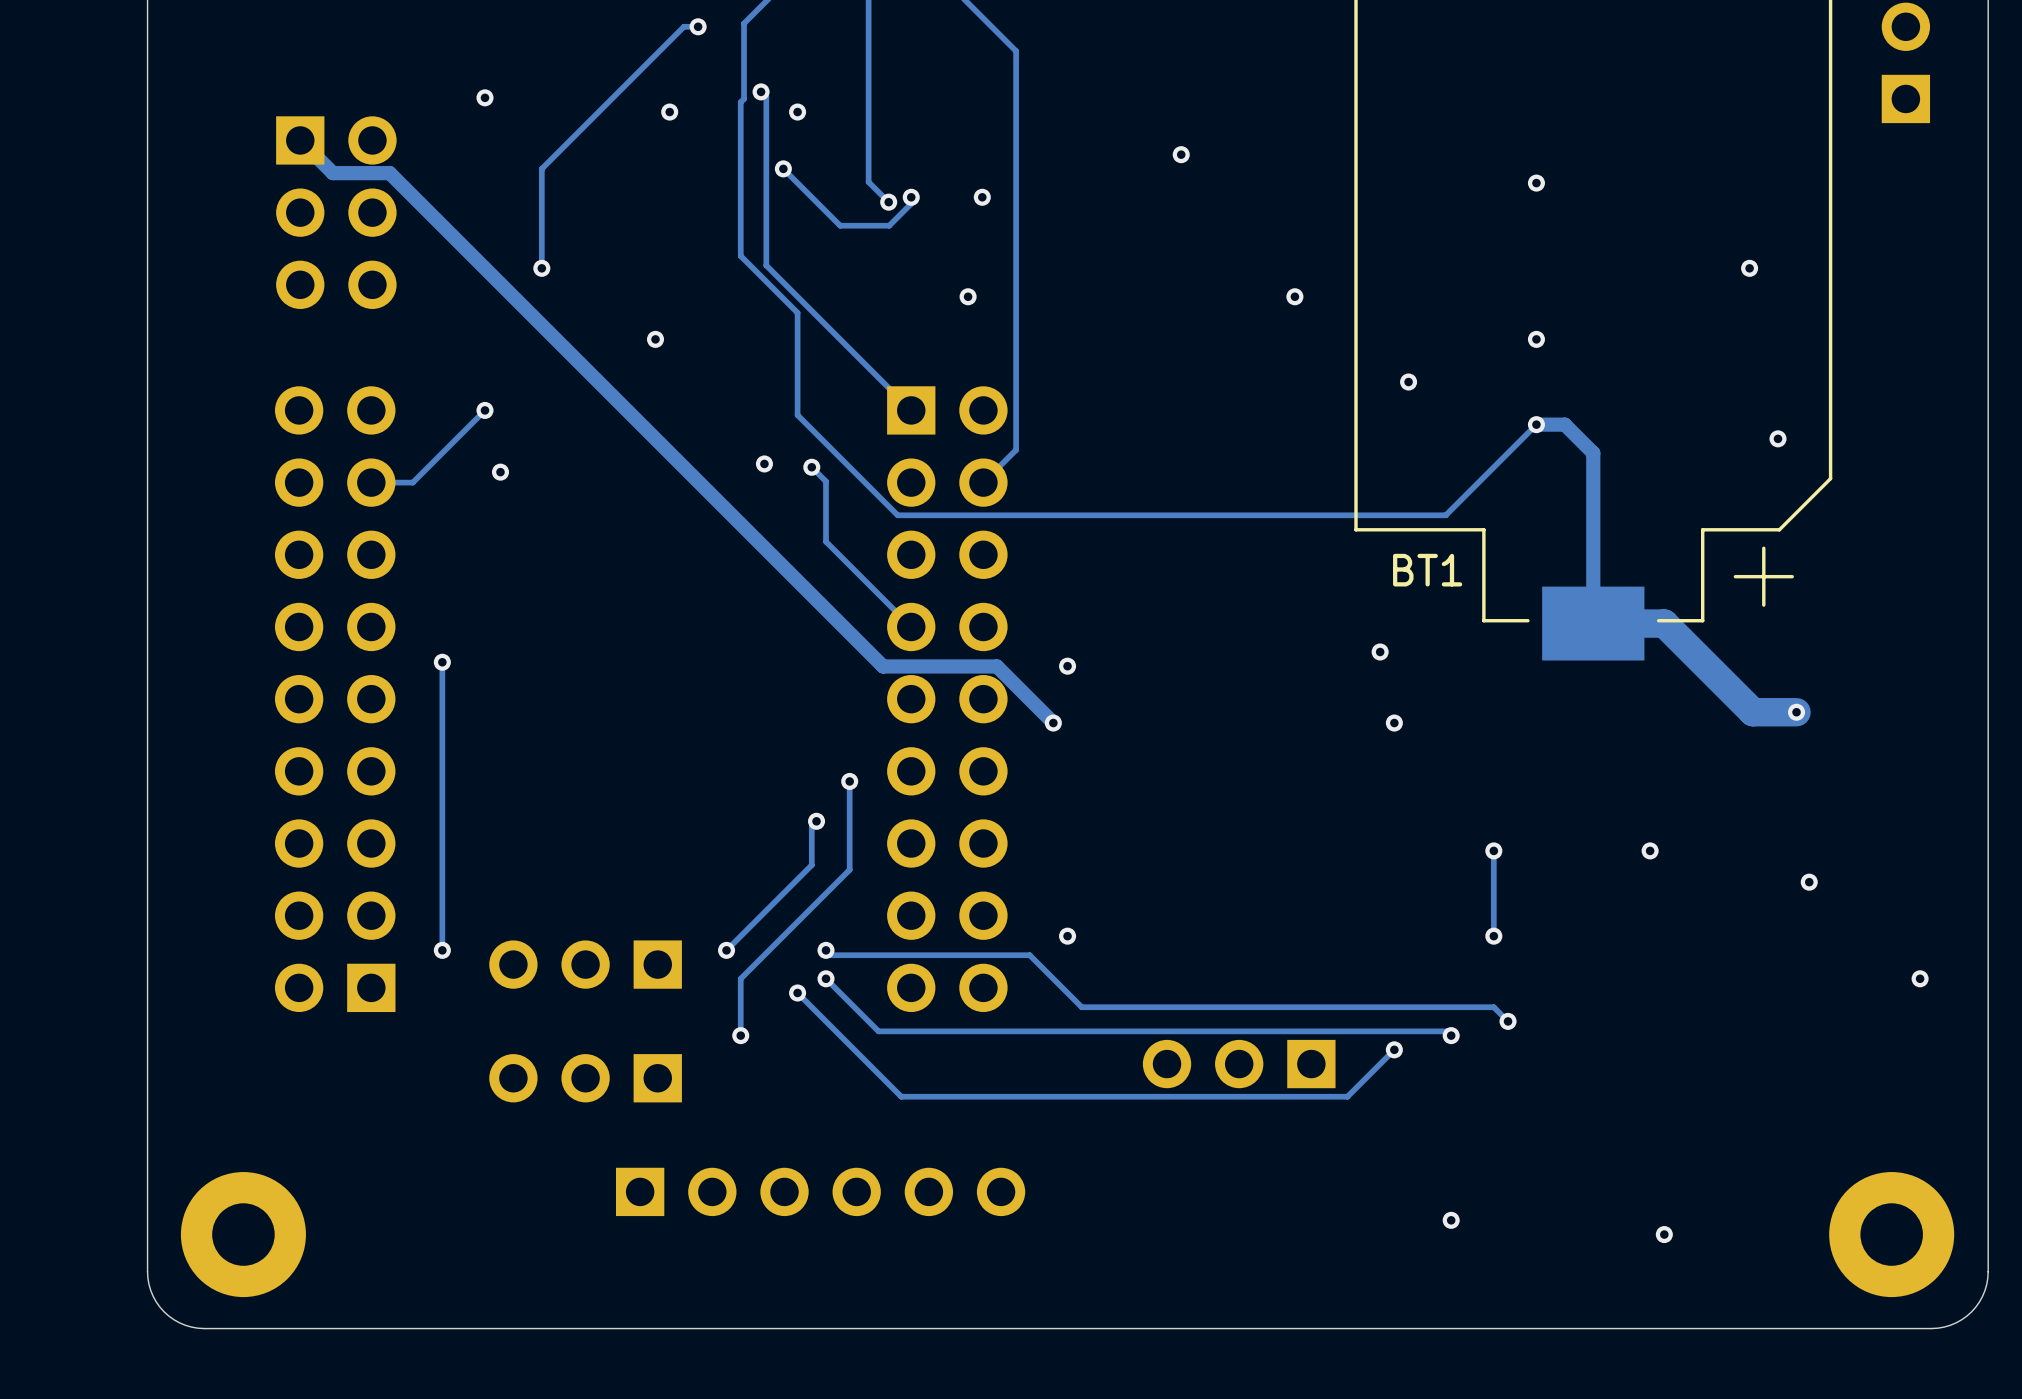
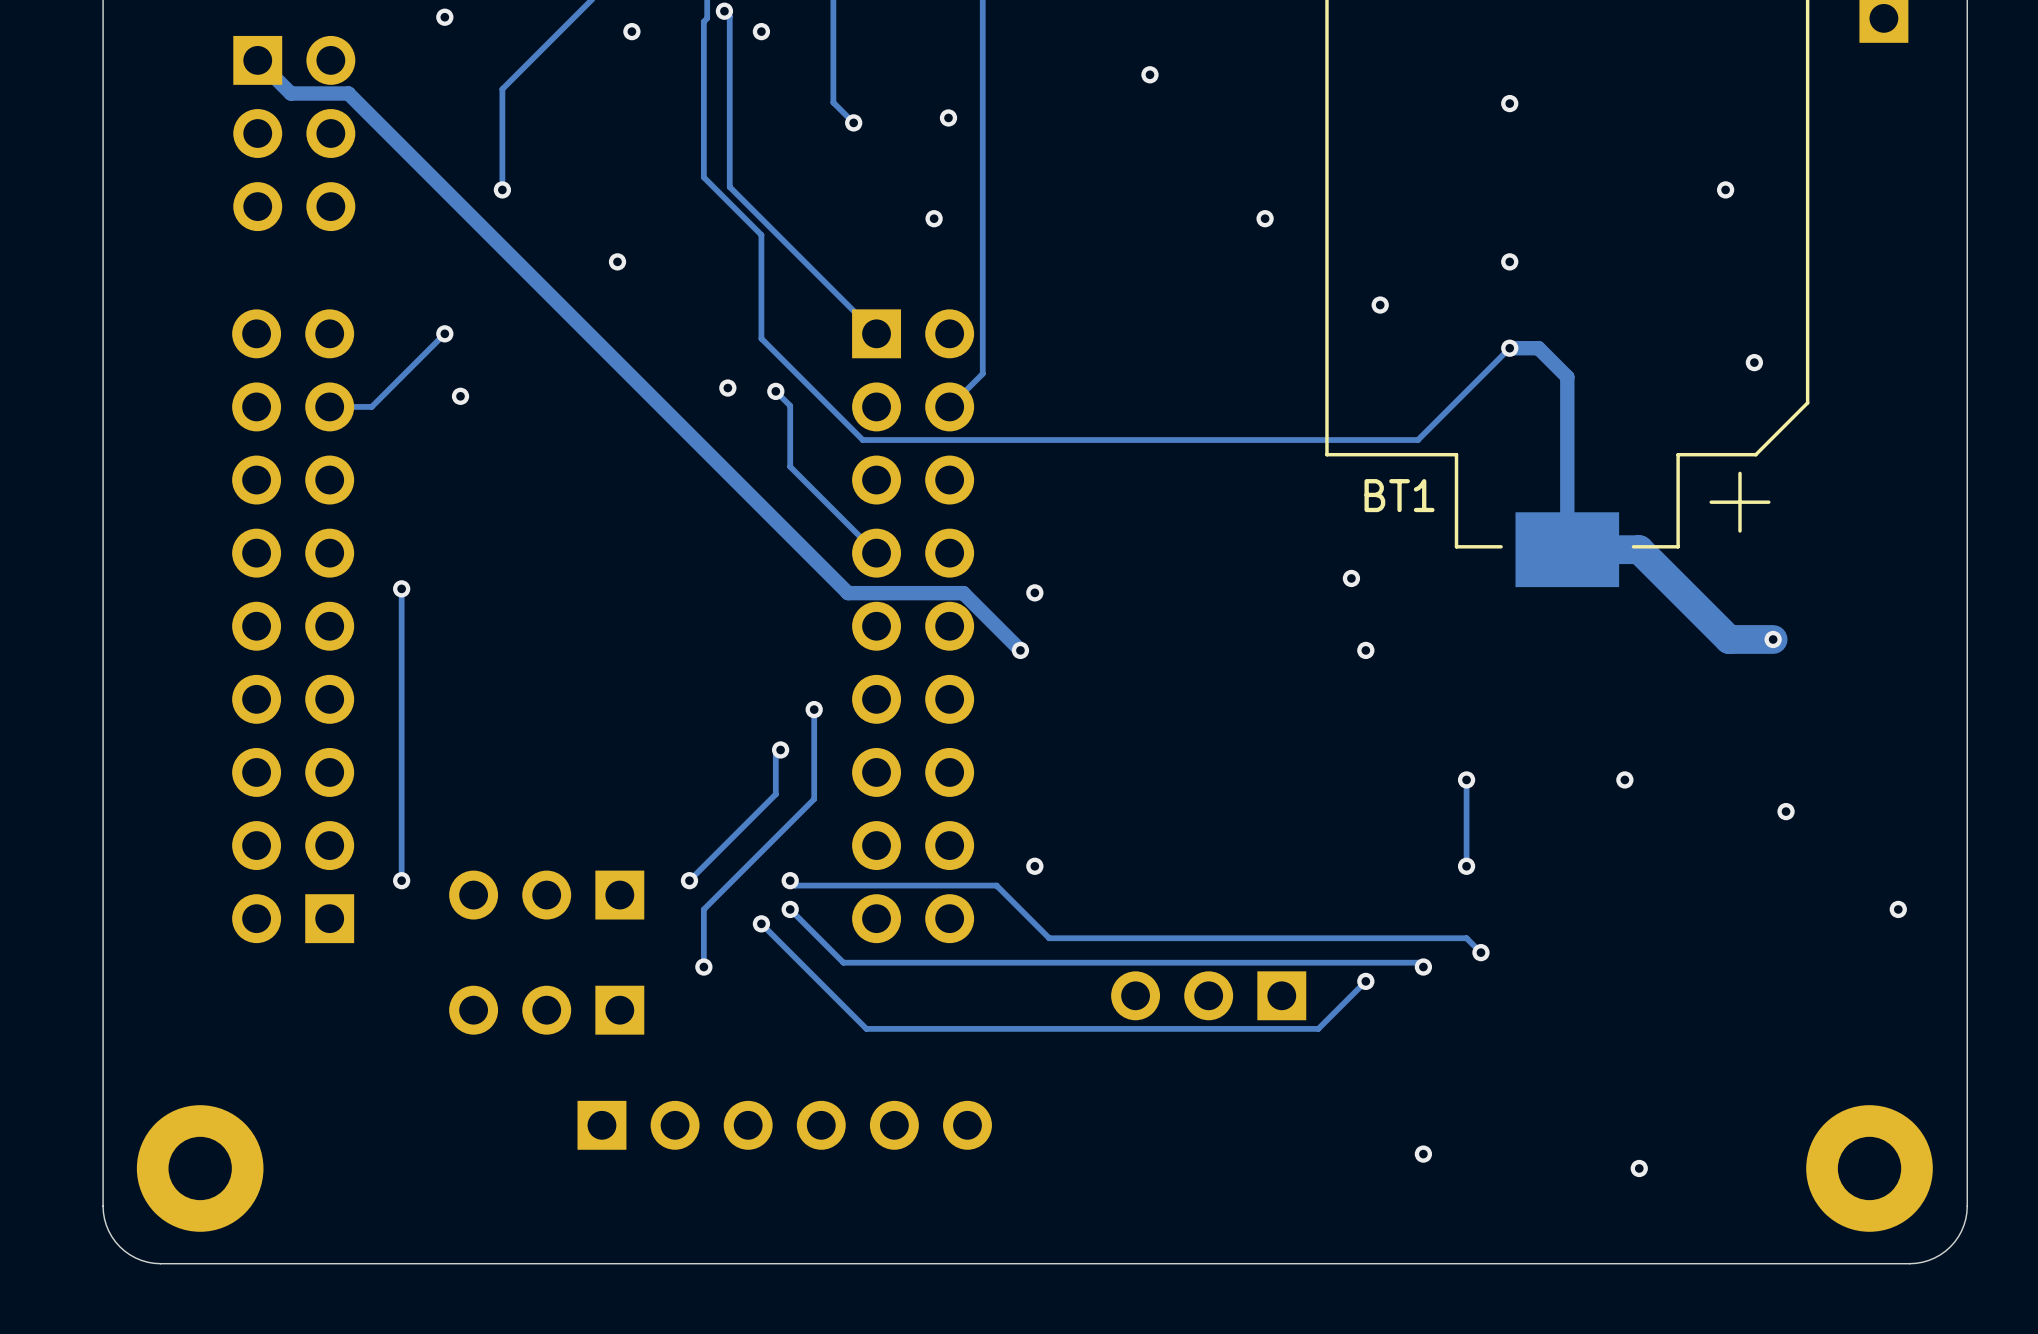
track: (783, 168) (840, 225) (889, 225) (911, 203) (911, 197) -> none
via: (783, 168) -> none
via: (911, 197) -> none

